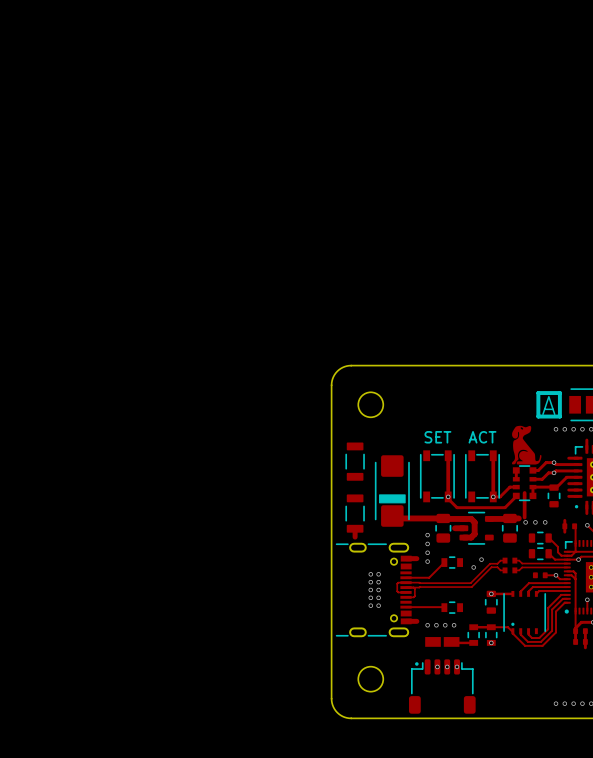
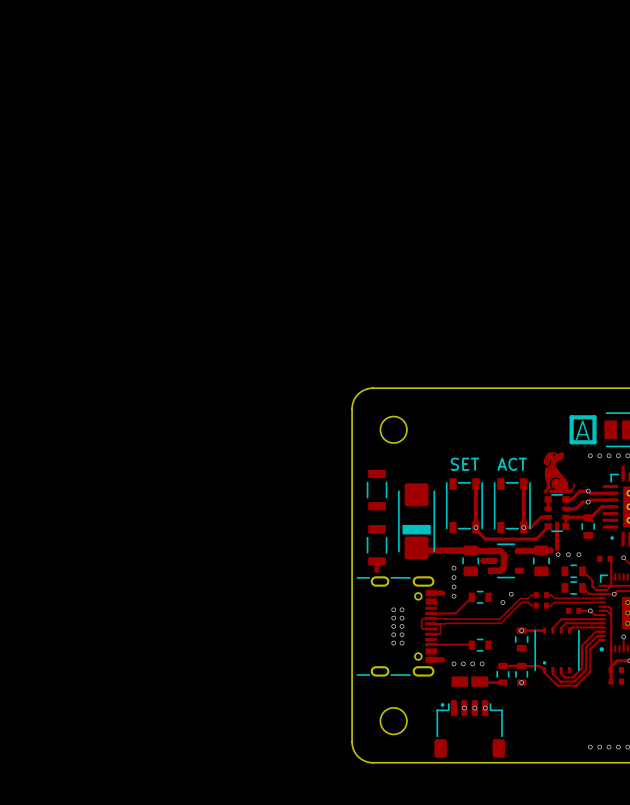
track: (564, 520) (564, 532) -> none
track: (585, 631) (585, 647) -> none

